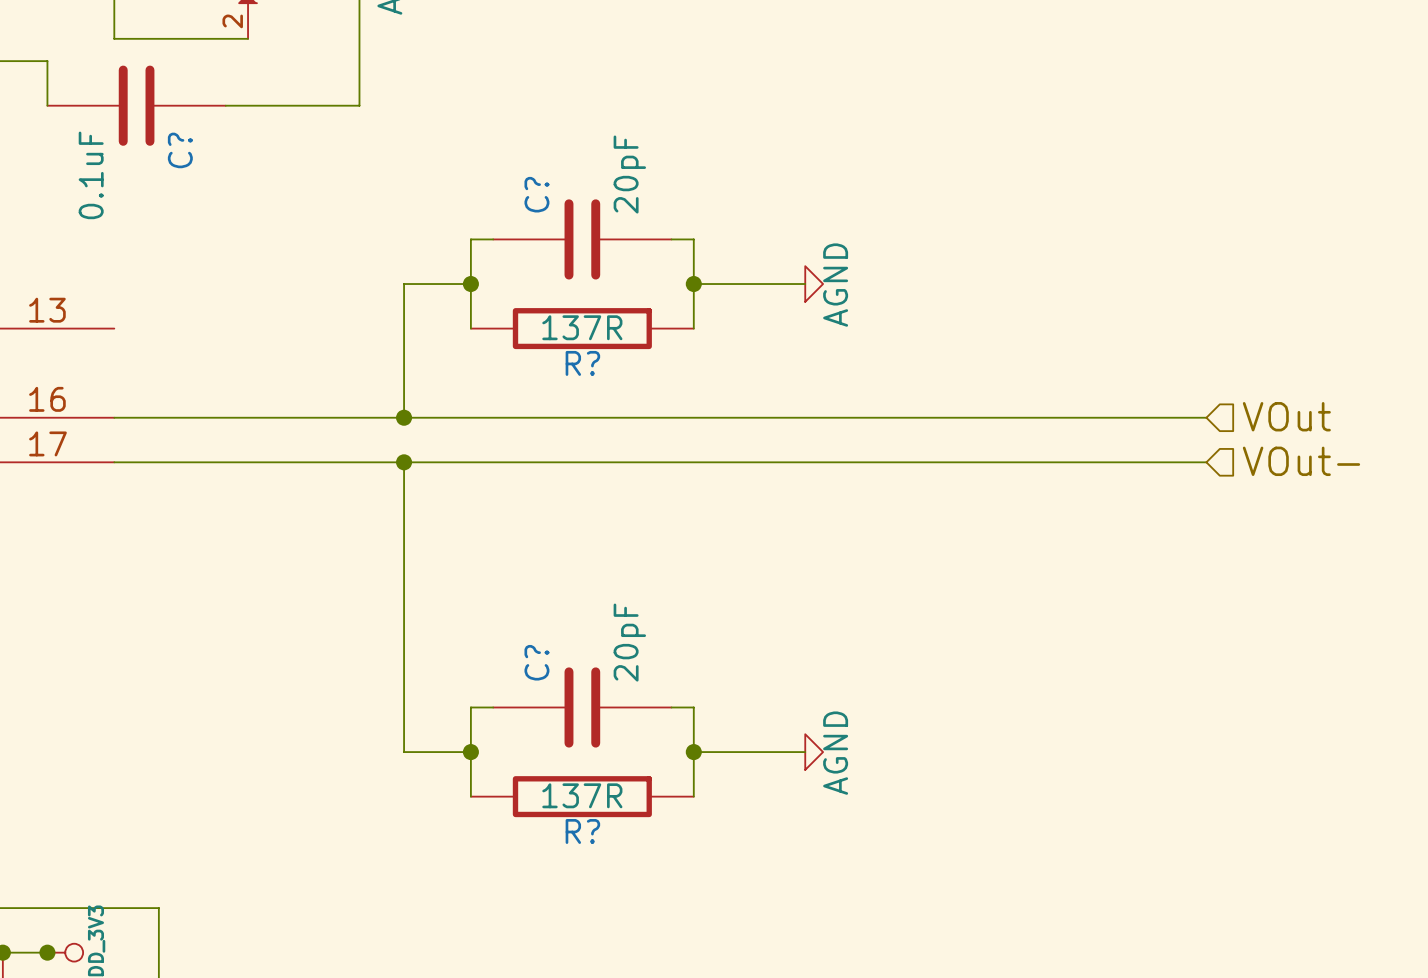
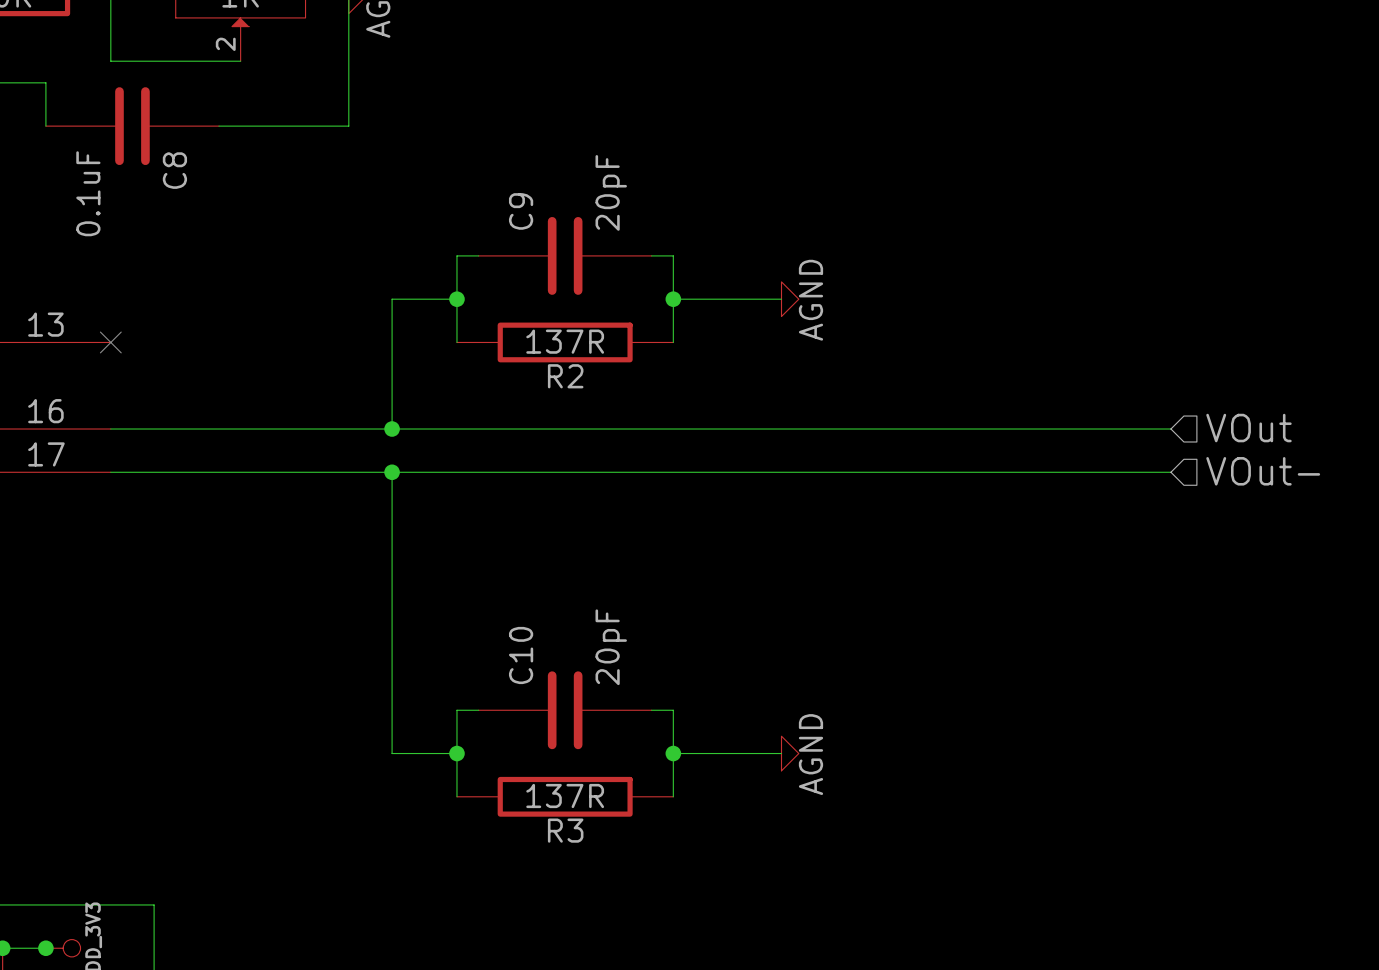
C? name: C? (180, 150) -> C8 (174, 170)
C? name: C? (536, 194) -> C9 (521, 211)
no-connect mark: none -> (110, 342)
R? name: R? (582, 363) -> R2 (565, 376)
C? name: C? (536, 662) -> C10 (521, 655)
R? name: R? (582, 831) -> R3 (565, 830)

